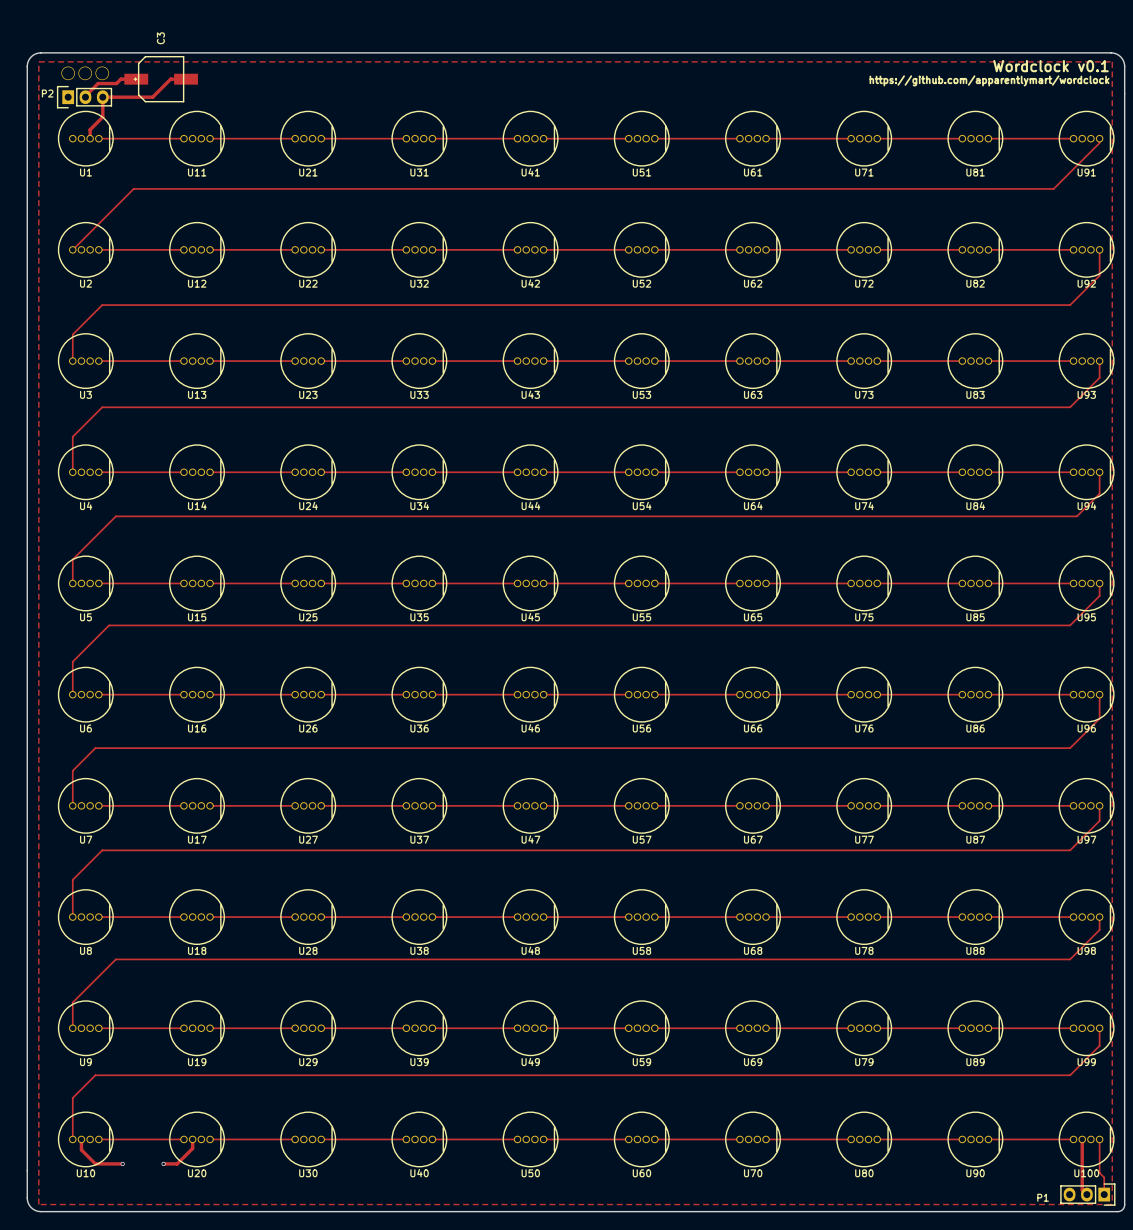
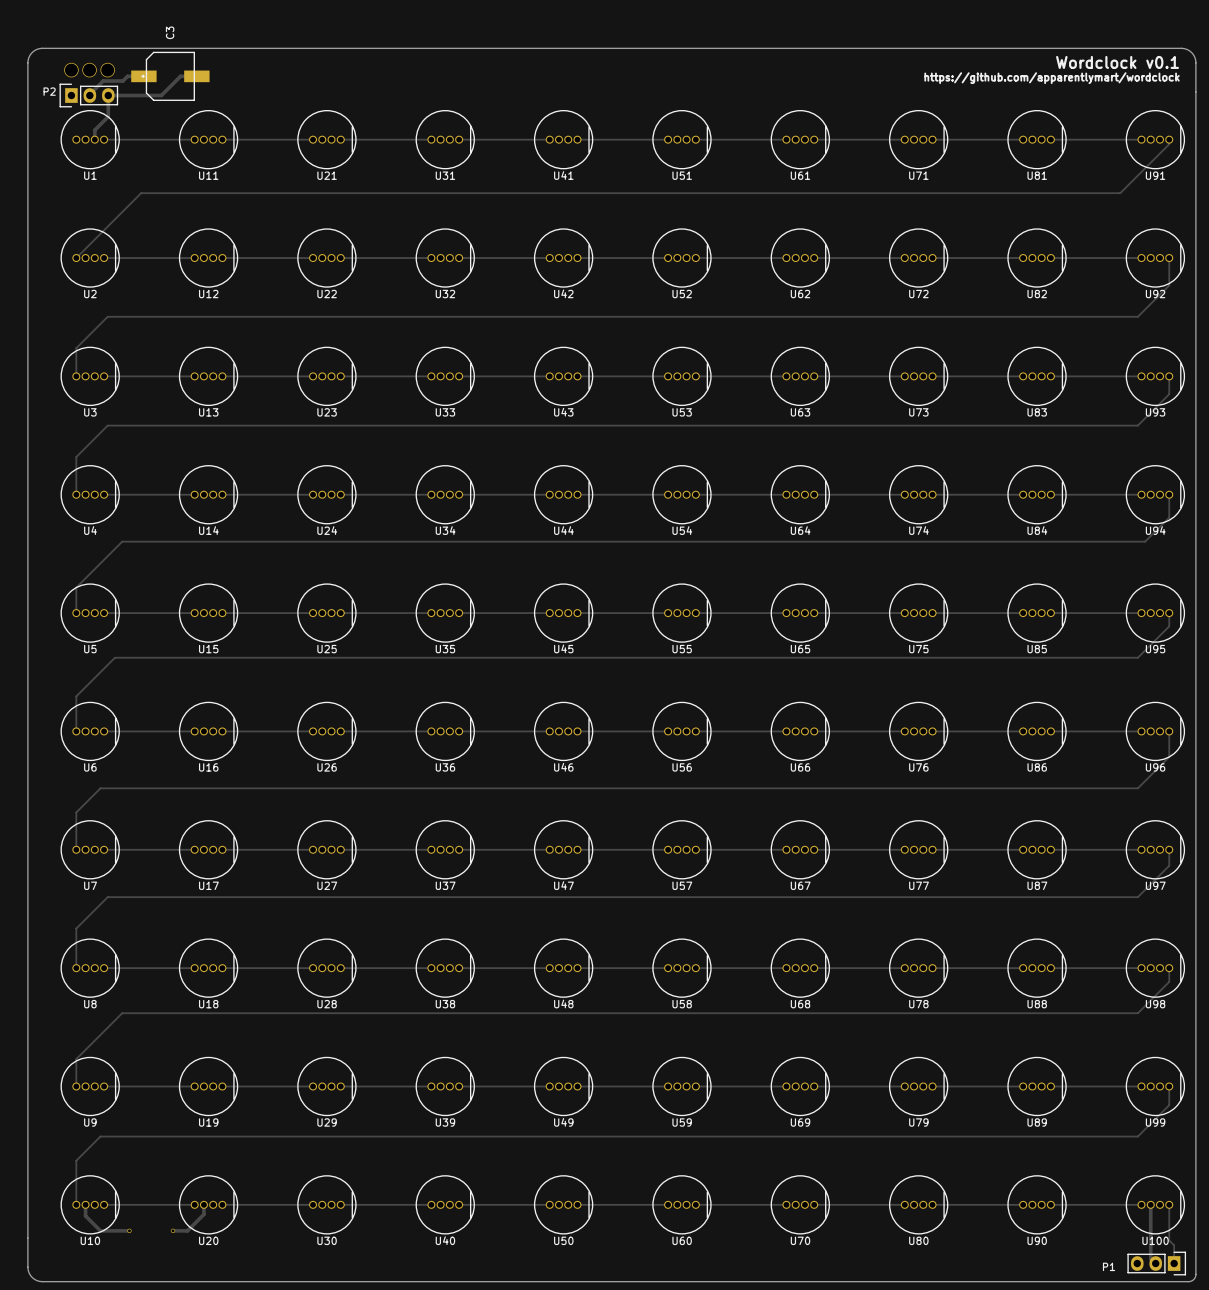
zone outline: (38, 61) (1112, 61) (1112, 1204) (38, 1204) (38, 61) -> none

